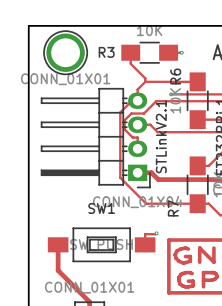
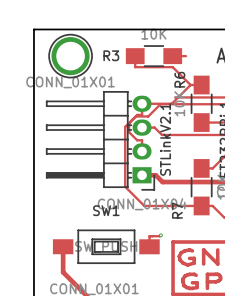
via: (181, 52) -> none
track: (130, 63) (145, 78) (145, 81) -> none
track: (145, 81) (186, 81) -> none
track: (145, 81) (137, 89) (137, 100) -> none
via: (171, 94) -> none
track: (137, 95) (120, 112) (120, 177) (146, 203) -> (135, 67) (172, 67) (190, 85) (171, 103) (142, 103) (142, 114) (137, 114) (125, 126) (125, 186) (144, 205) (150, 205)

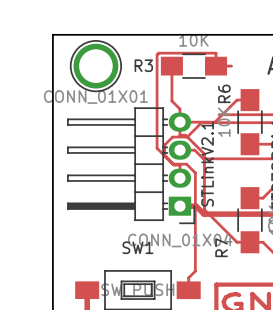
track: (135, 67) (172, 67) (190, 85) -> (171, 79) (171, 100) (179, 109) (179, 122)
track: (142, 114) (137, 114) (125, 126) (125, 186) (144, 205) (190, 205) -> (179, 135) (185, 135) (204, 154) (204, 209) (237, 242)
track: (160, 235) (149, 236) -> (216, 66) (216, 53) (158, 53) (157, 54) (157, 148) (172, 164) (186, 164) (195, 172) (195, 271) (188, 277)
via: (160, 235) -> none

